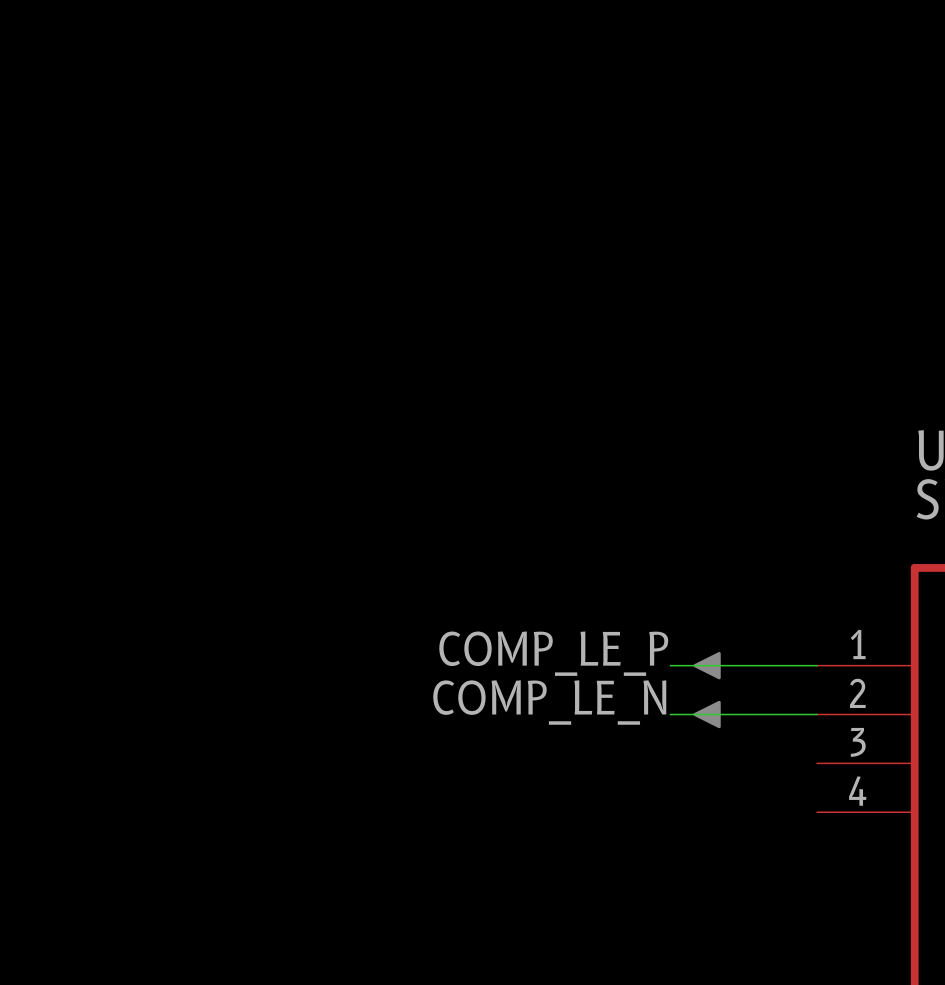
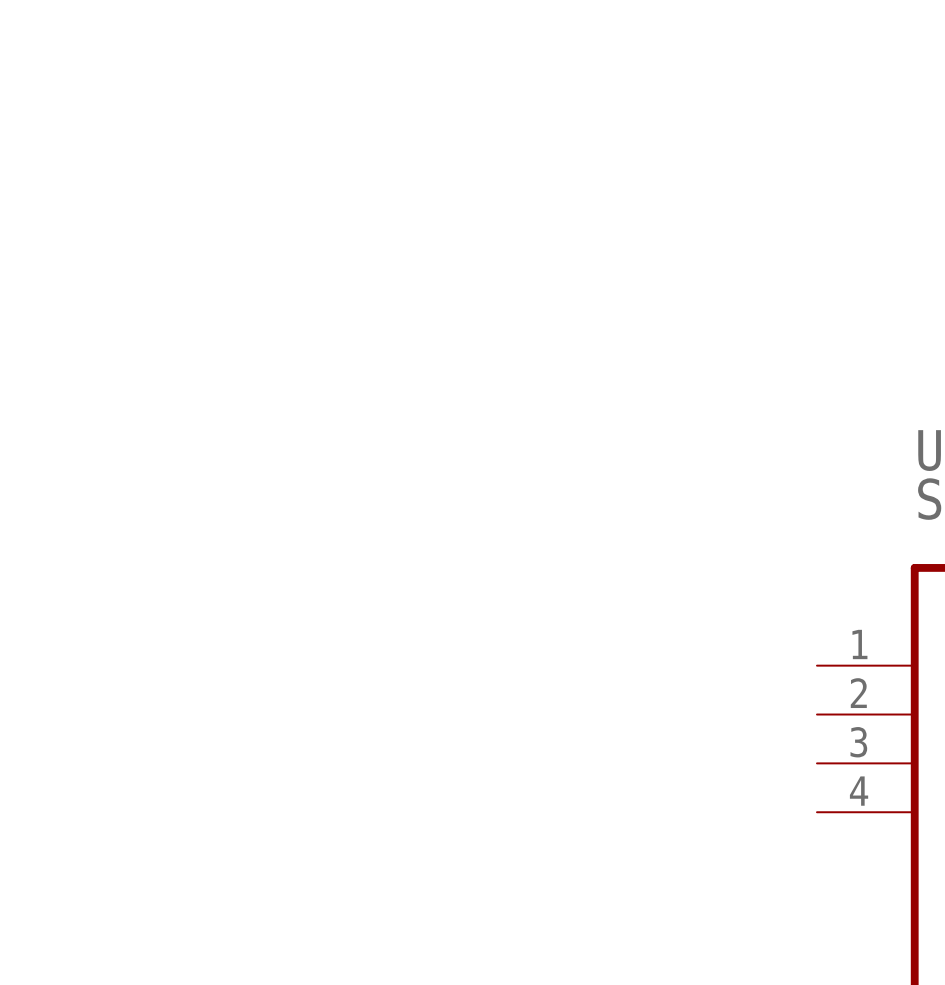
label: COMP_LE_P (553, 653) -> none
wire: (670, 665) (816, 665) -> none
part: (707, 665) -> none
label: COMP_LE_N (549, 702) -> none
wire: (670, 714) (816, 714) -> none
part: (707, 714) -> none

